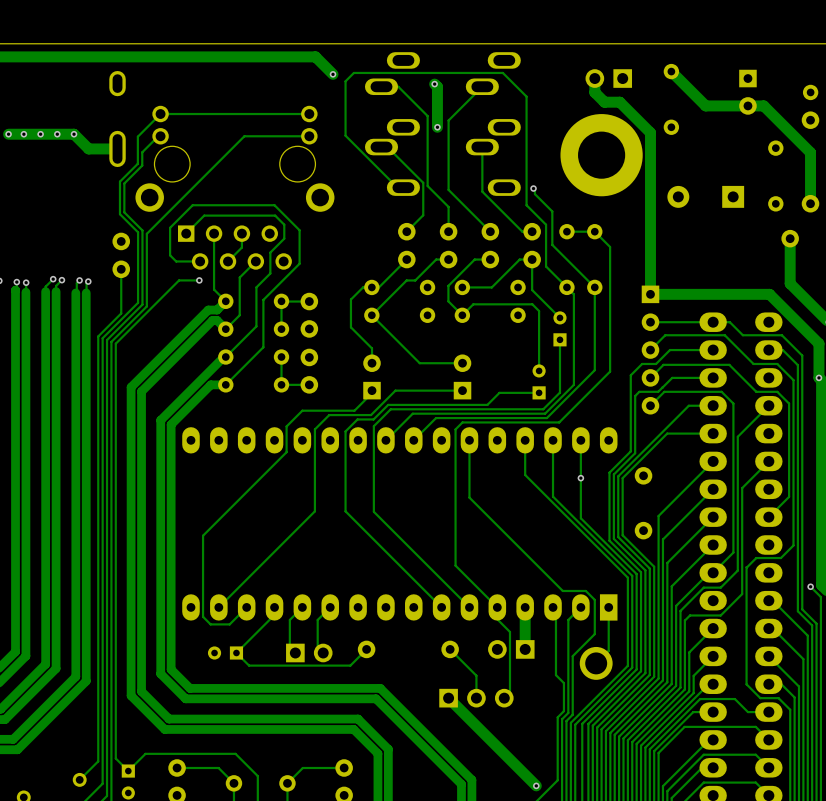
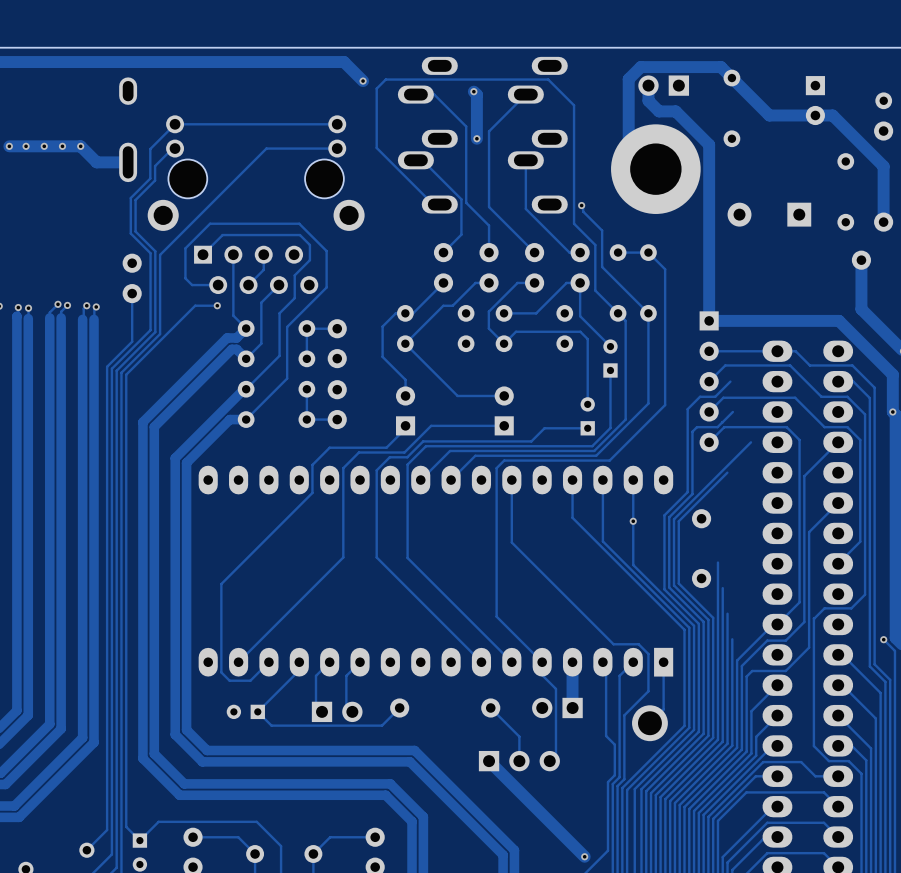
track: none -> (731, 78) (720, 67) (640, 67) (628, 79) (628, 142) (655, 169)
track: (713, 350) (669, 350) -> none
track: (713, 377) (672, 377) -> none
track: (713, 405) (688, 405) -> none
track: (713, 433) (667, 433) -> none
track: (713, 461) (658, 516) -> none
track: (713, 489) (662, 539) -> none
track: (713, 517) (667, 562) -> none
track: (713, 544) (671, 586) -> none

